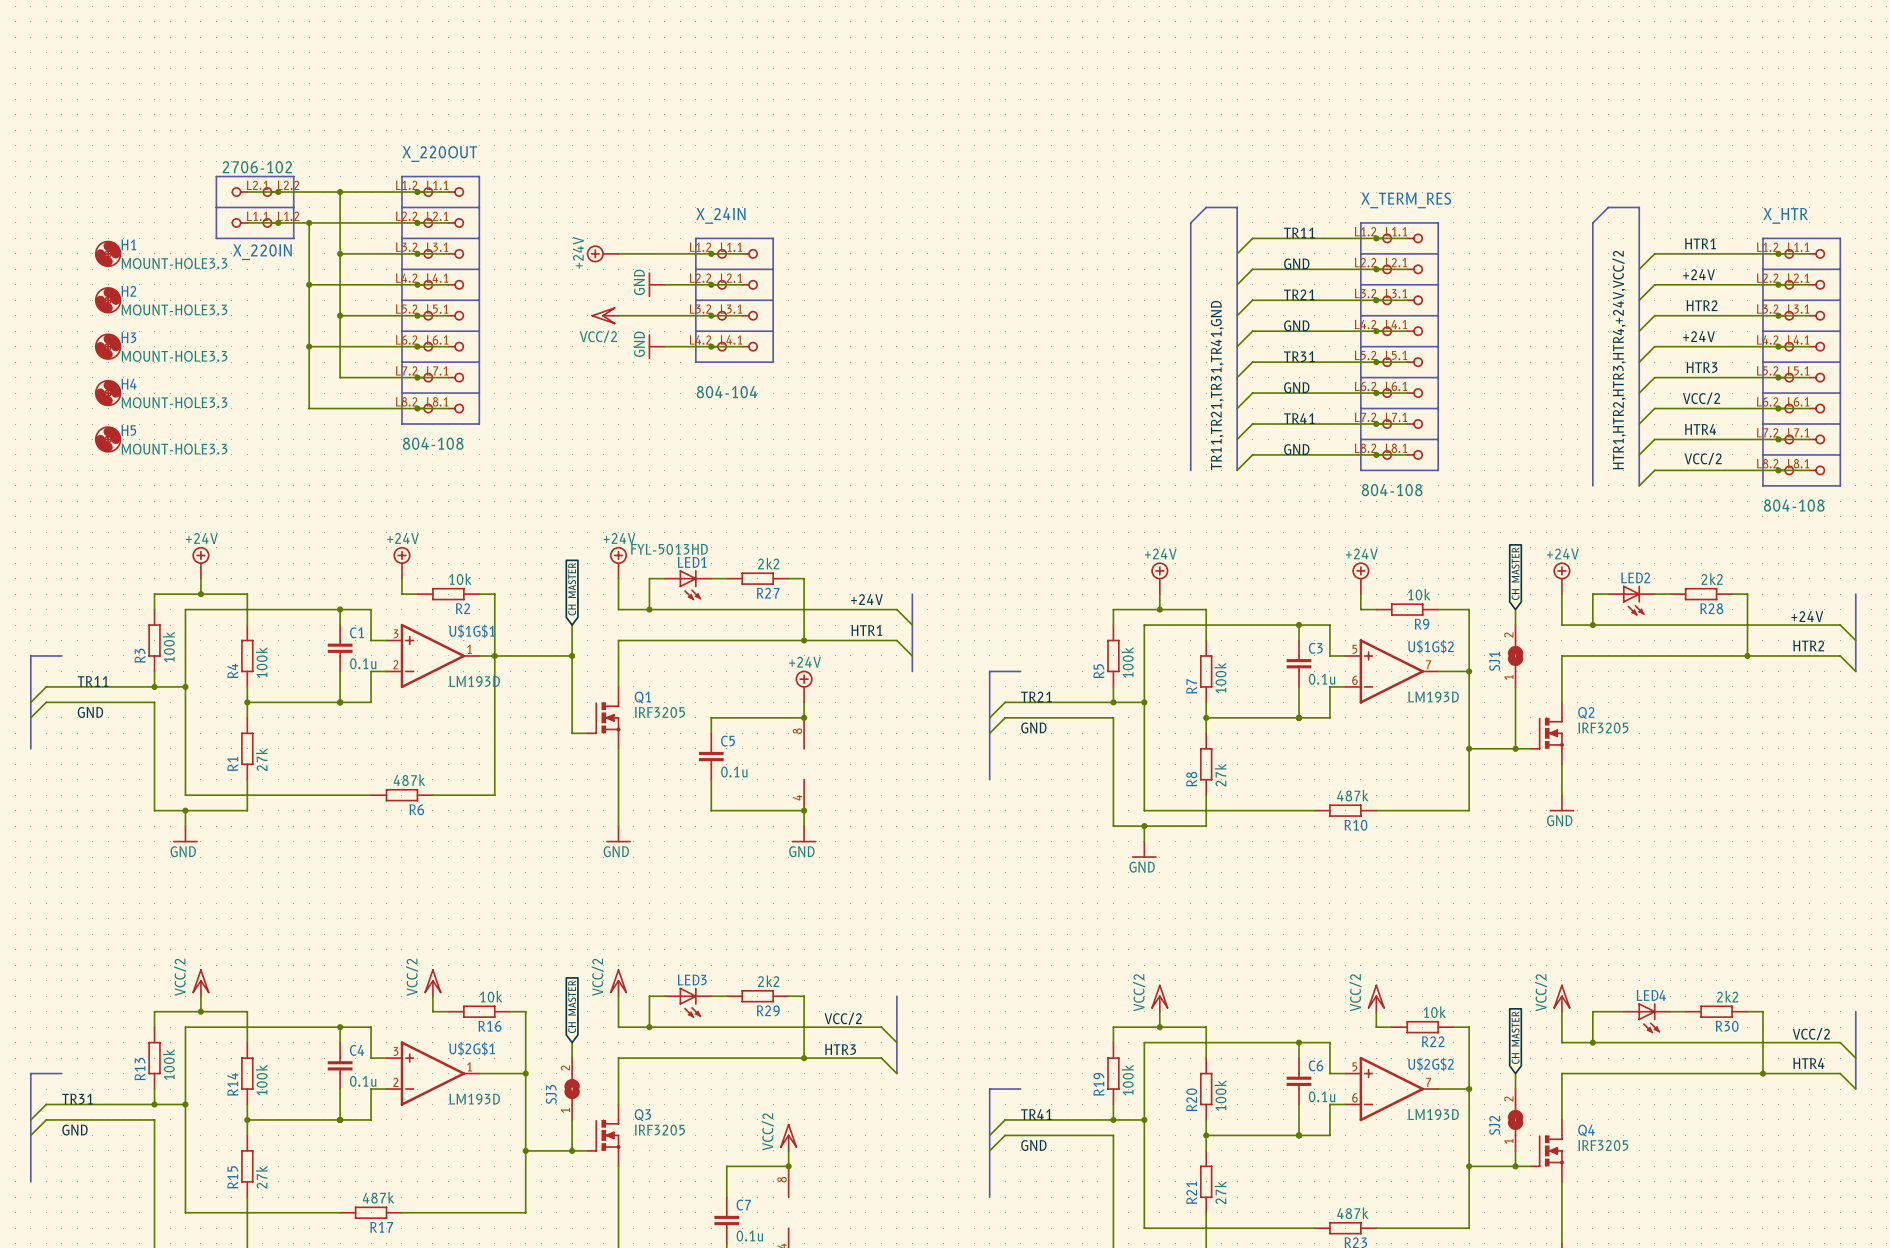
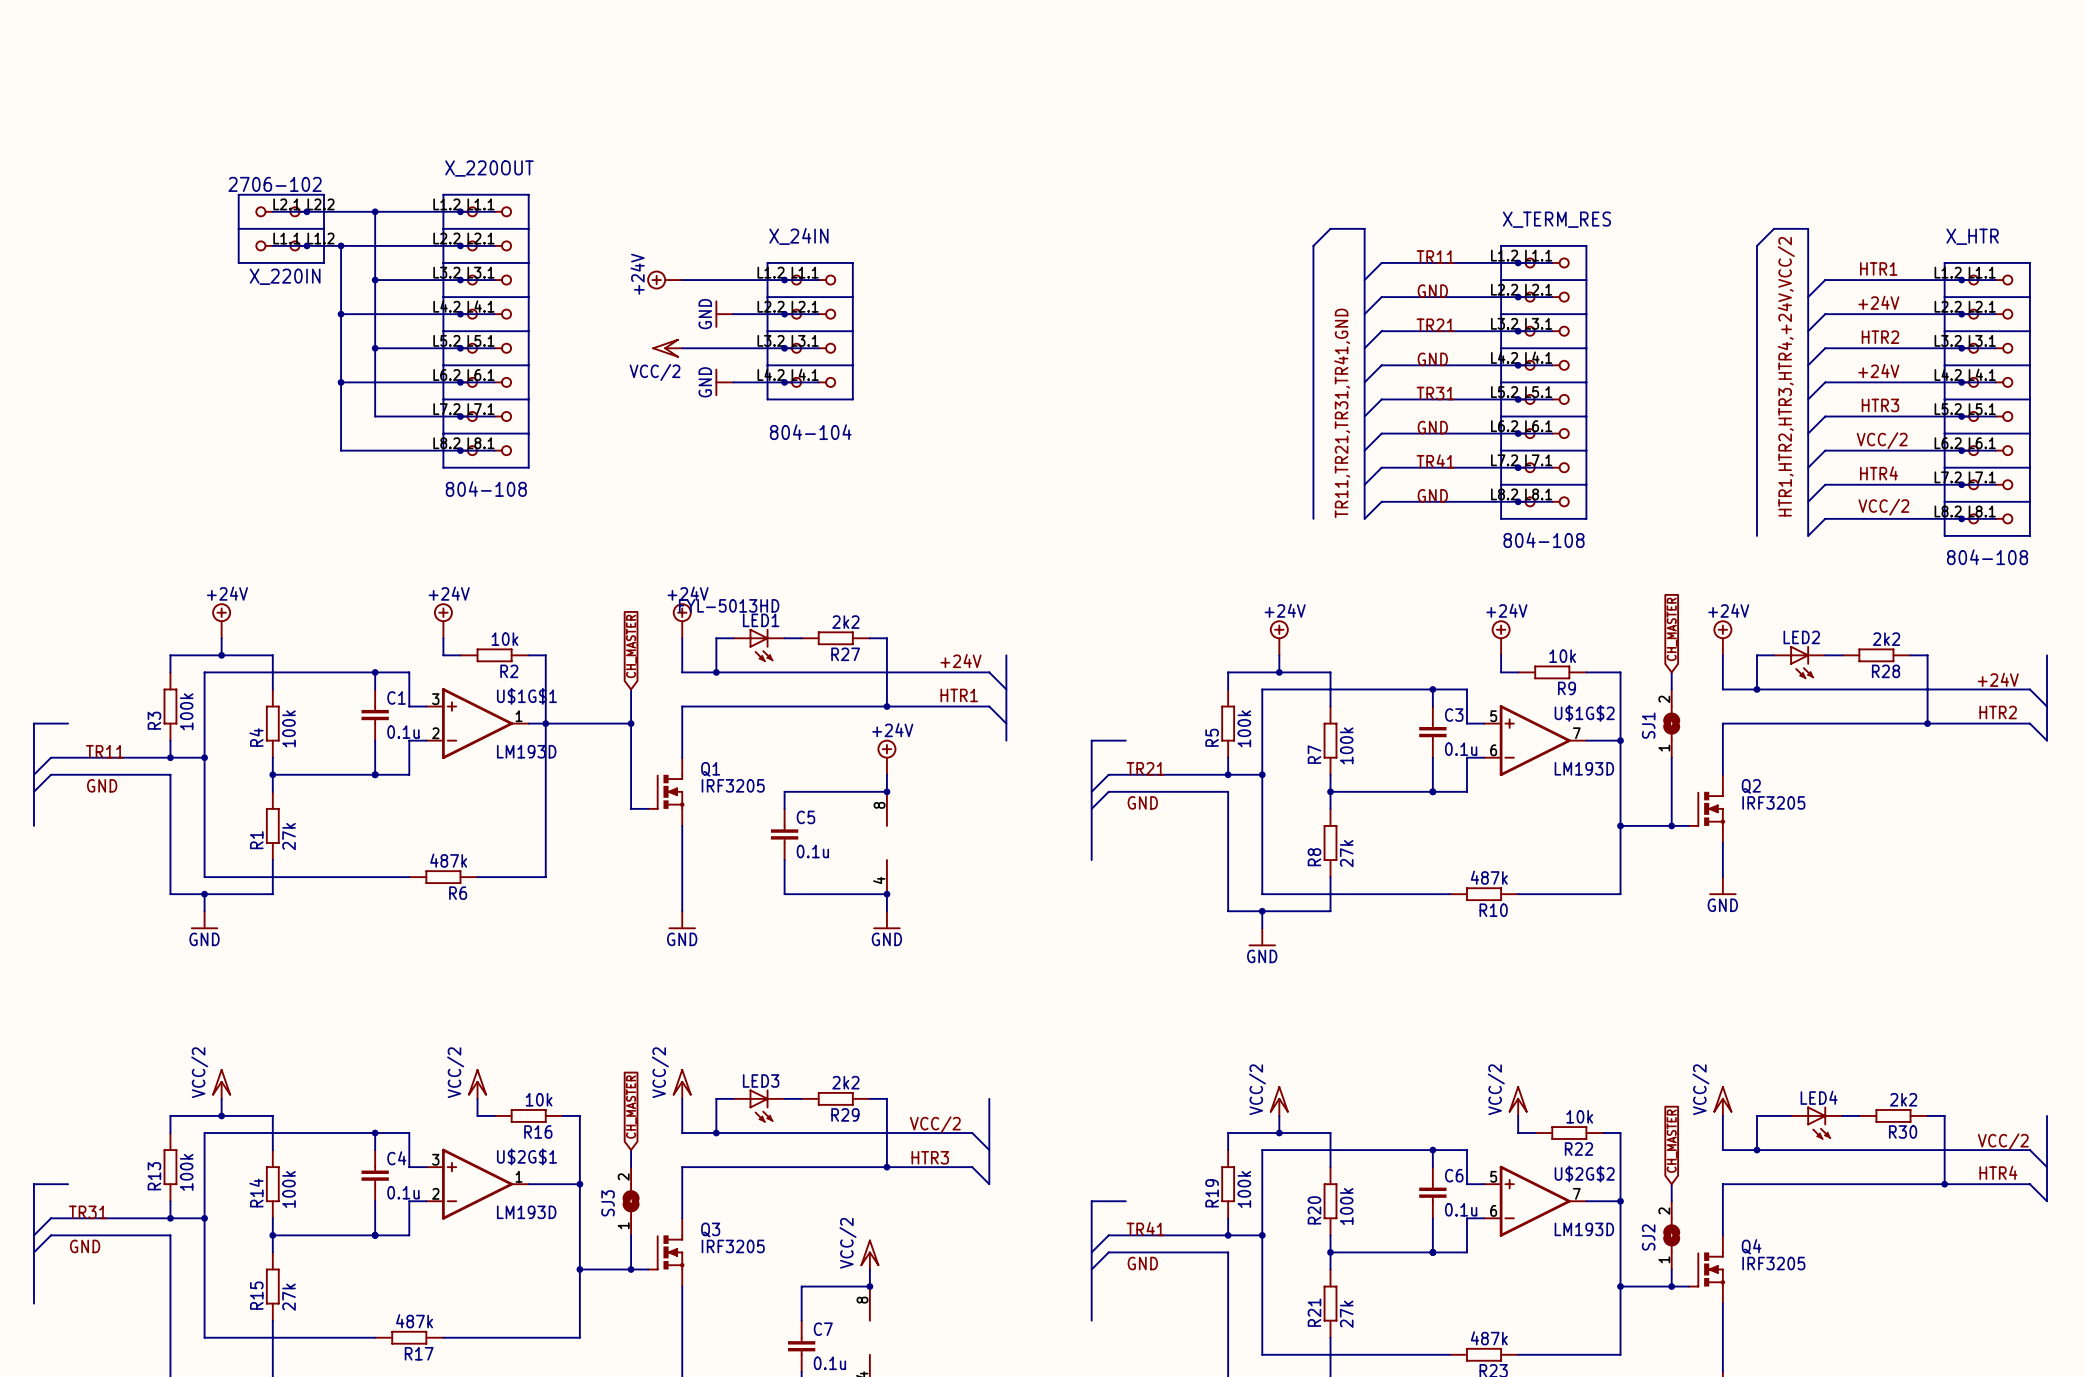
H1: MOUNT-HOLE3.3 (108, 253) -> none
H2: MOUNT-HOLE3.3 (108, 300) -> none
H3: MOUNT-HOLE3.3 (108, 346) -> none
H4: MOUNT-HOLE3.3 (108, 393) -> none
H5: MOUNT-HOLE3.3 (108, 439) -> none

